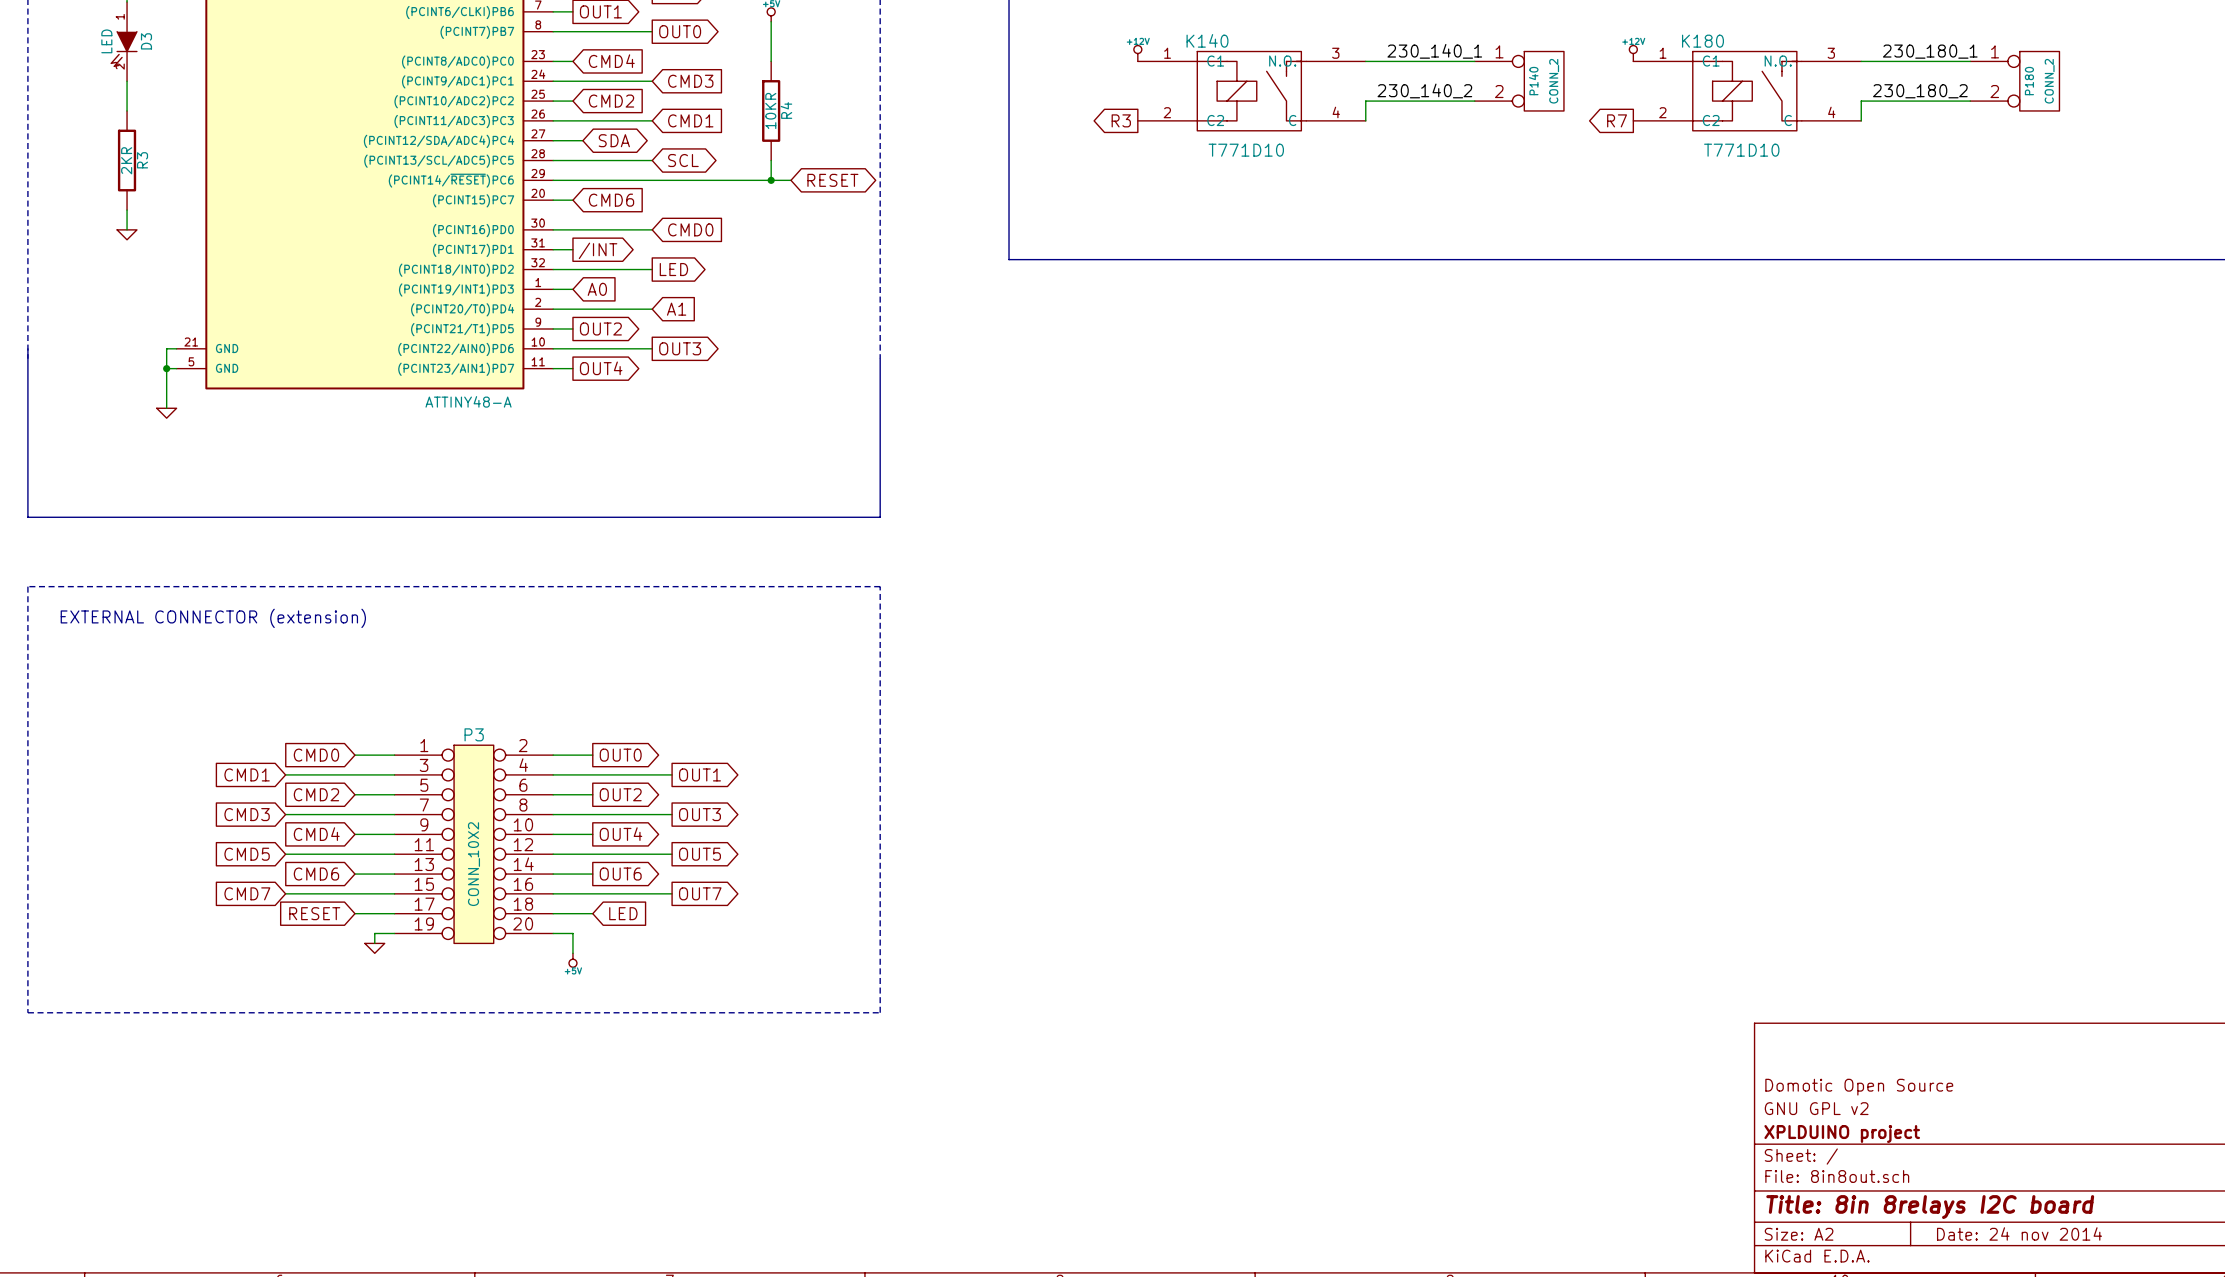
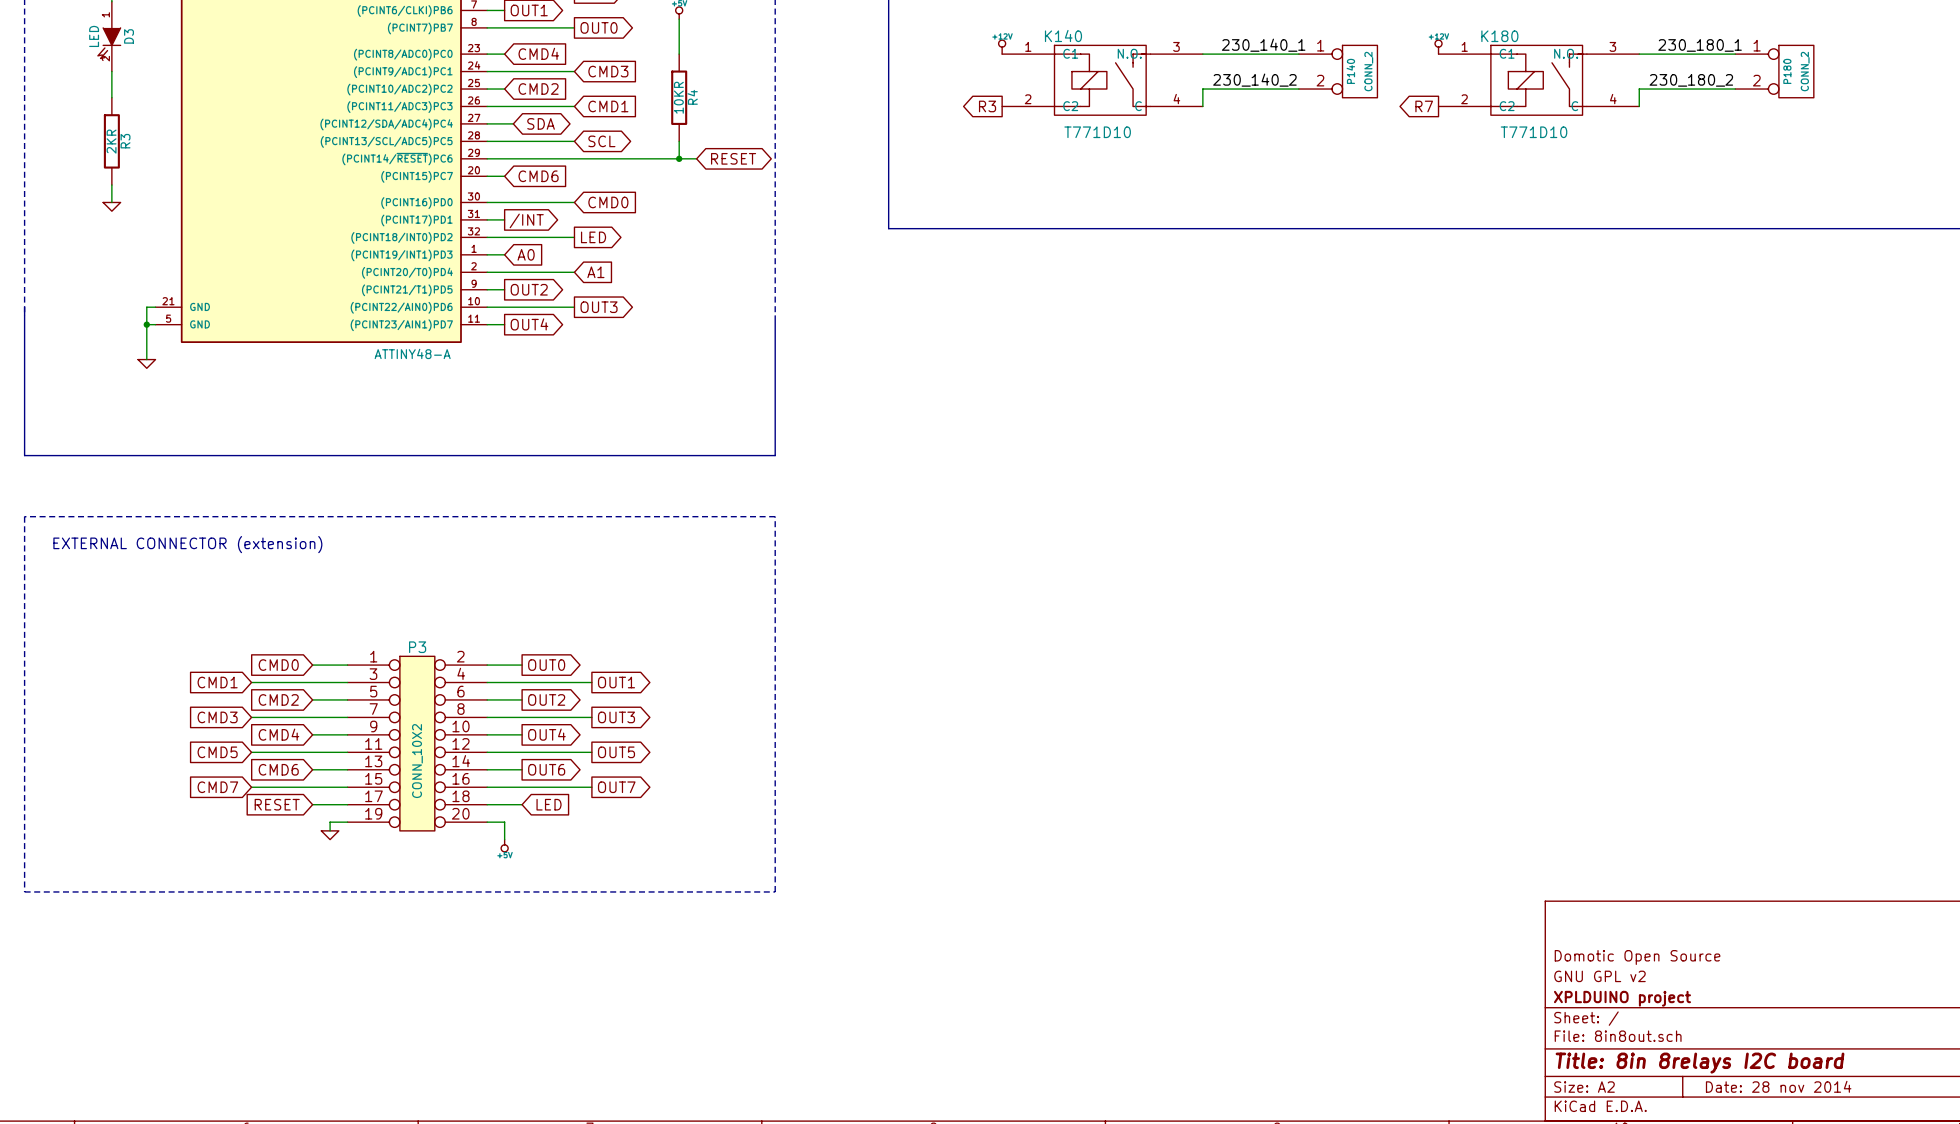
title block: Date: 24 nov 2014 (2019, 1233) -> Date: 28 nov 2014 (1778, 1086)

